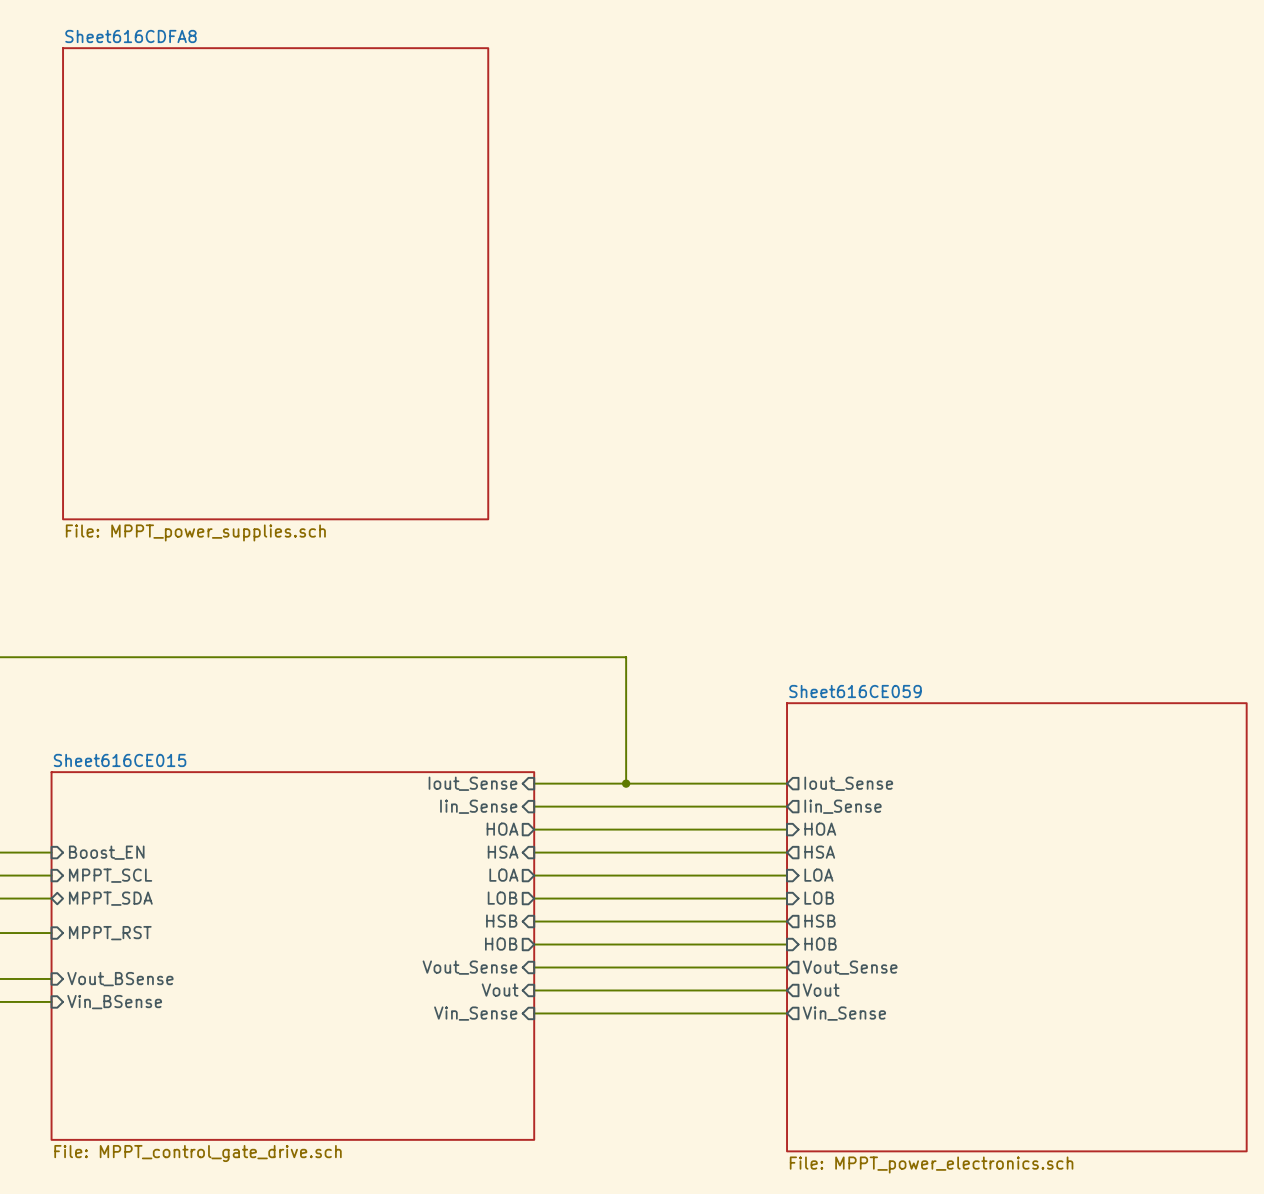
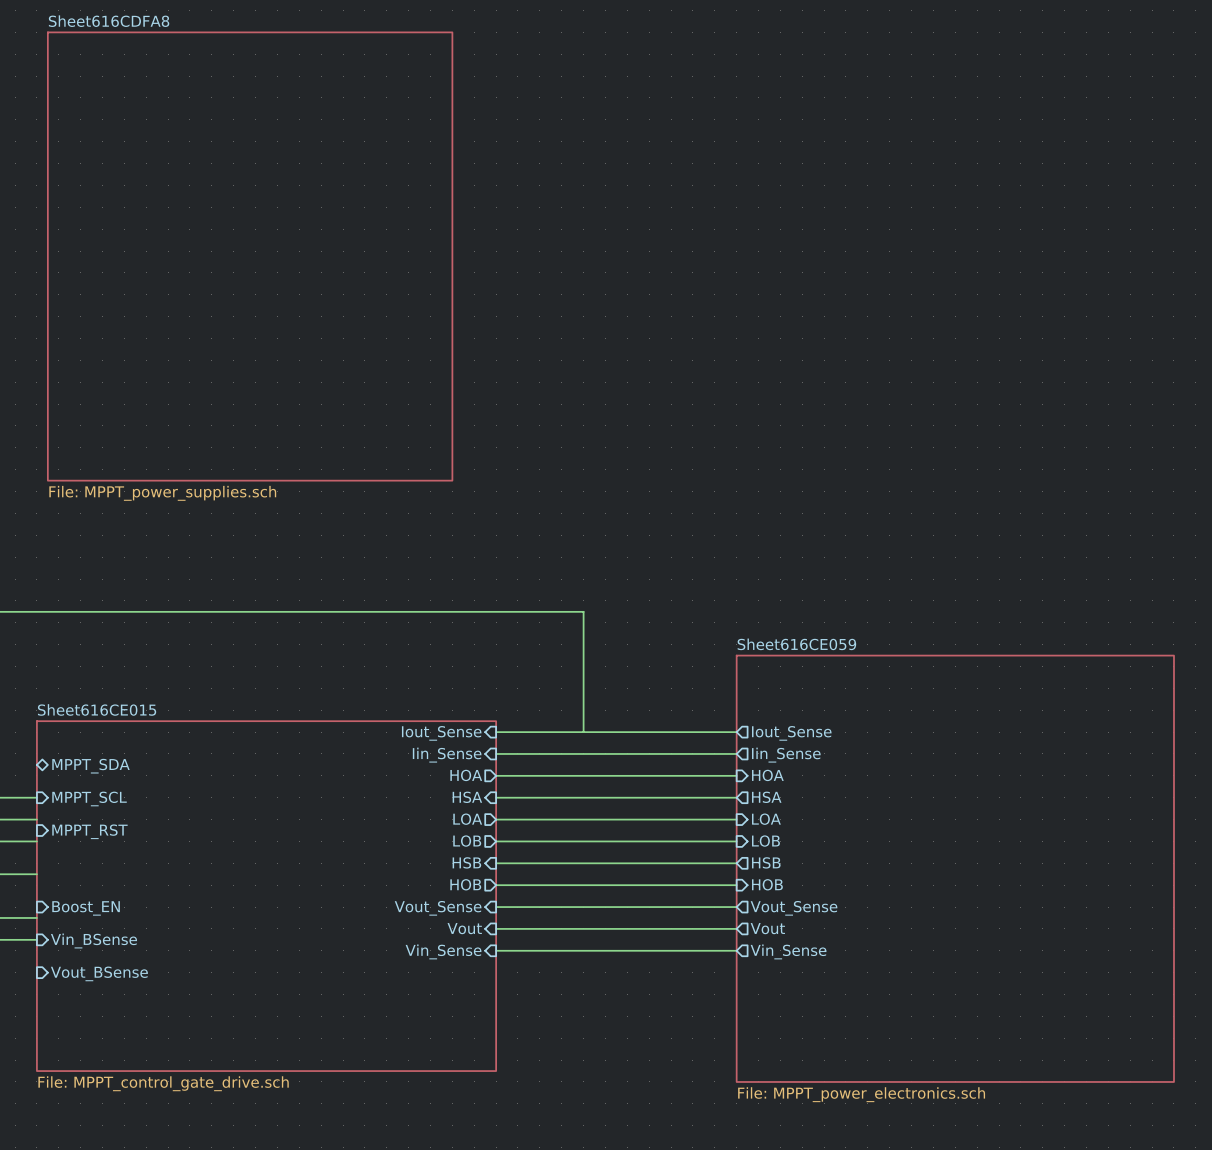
junction: (626, 783) -> none
sheet pin: Boost_EN (106, 852) -> MPPT_SCL (89, 798)
sheet pin: MPPT_SCL (110, 875) -> none
sheet pin position: MPPT_SDA (110, 898) -> MPPT_SDA (90, 766)
sheet pin position: MPPT_RST (110, 933) -> MPPT_RST (89, 831)
sheet pin: none -> Boost_EN (86, 908)
sheet pin position: Vout_BSense (120, 979) -> Vout_BSense (99, 973)

